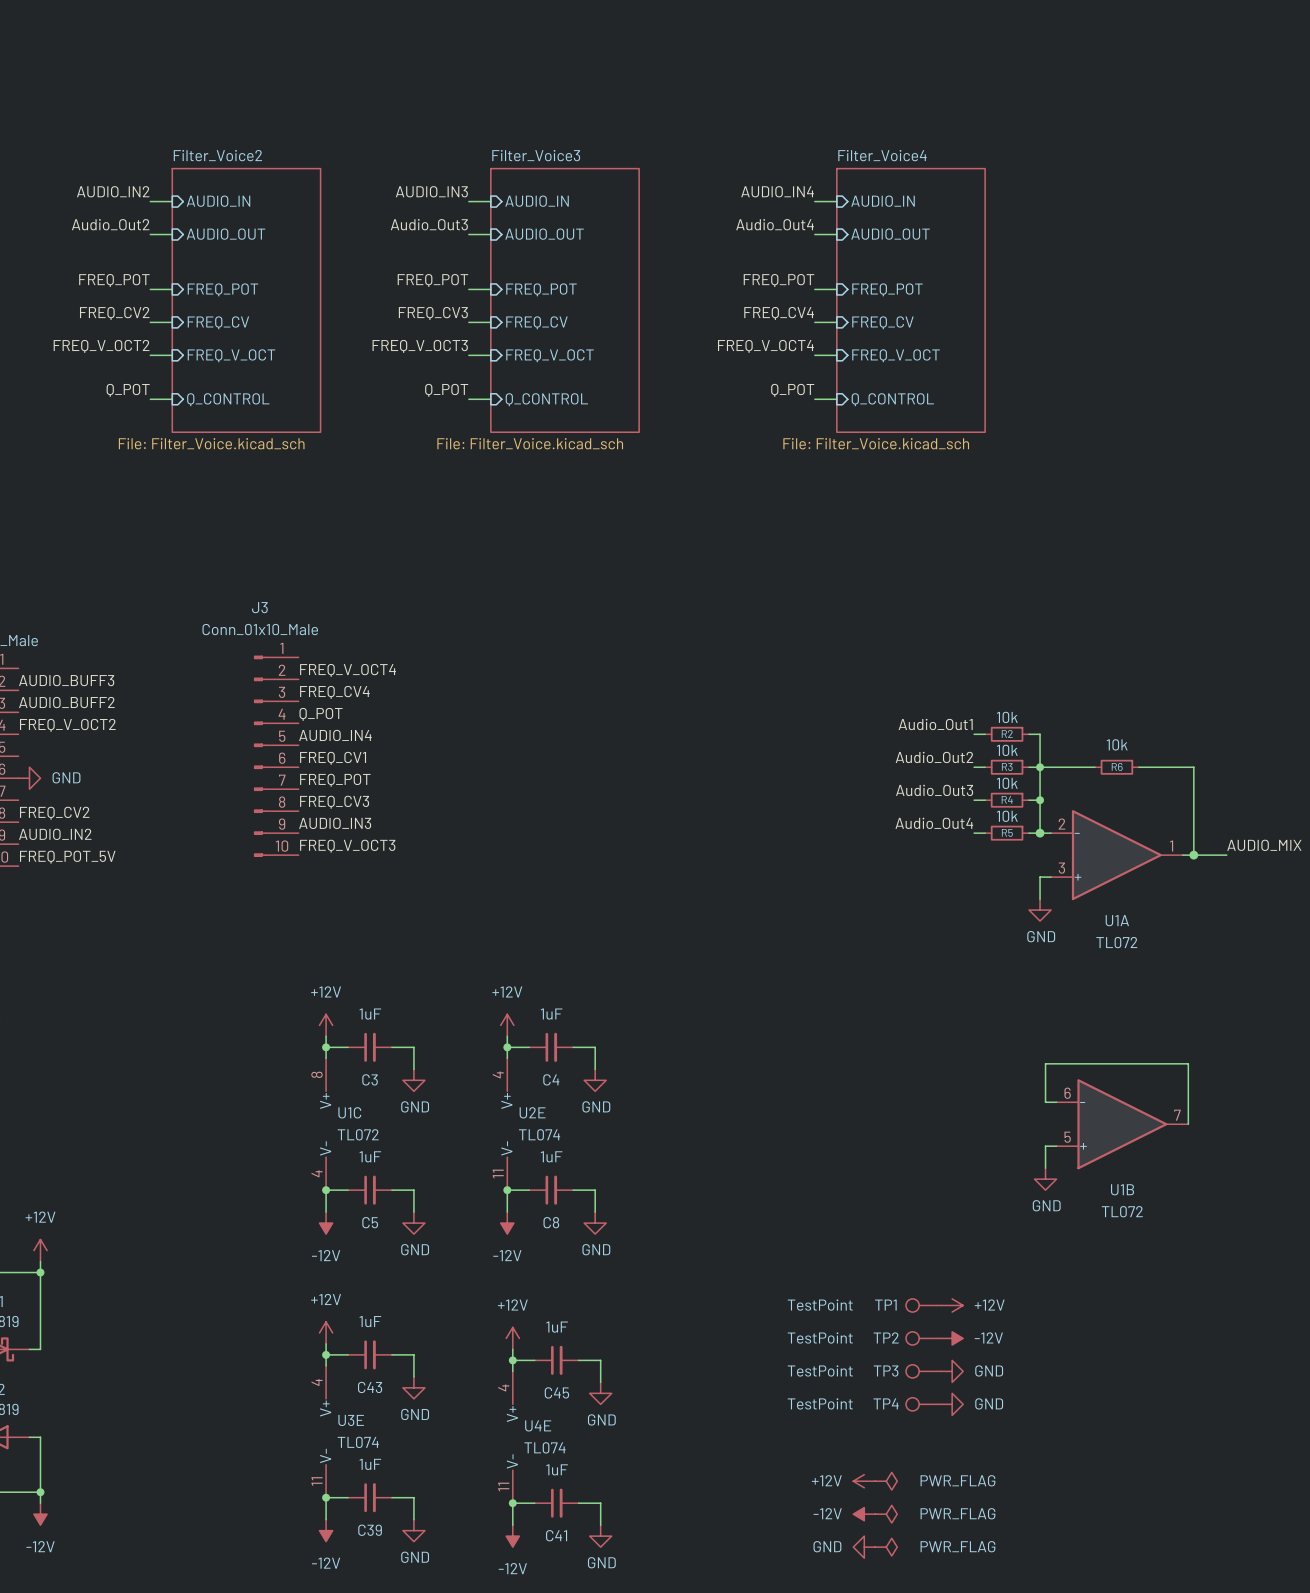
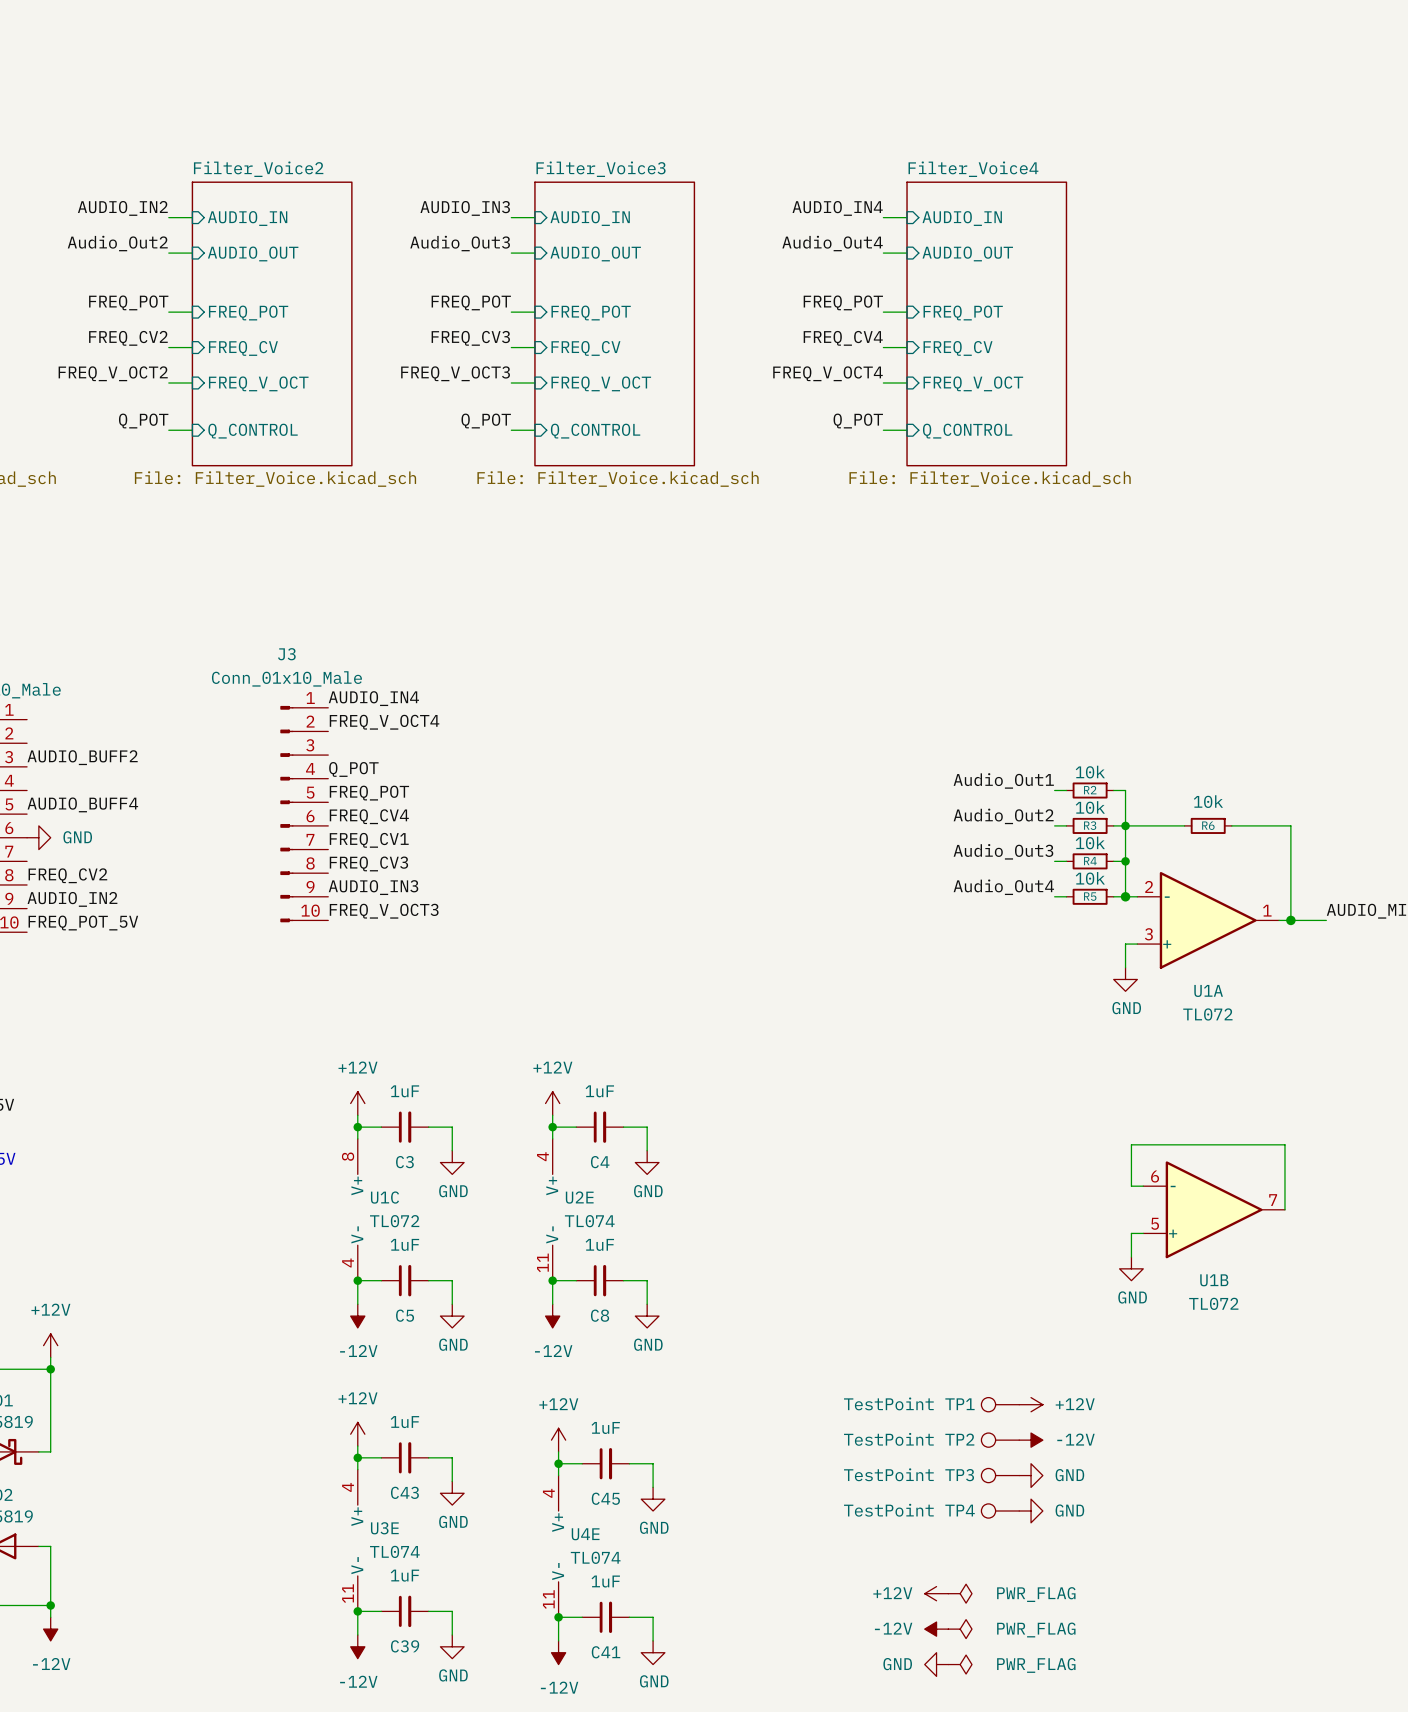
label: none -> AUDIO_IN4 (373, 698)
label: AUDIO_BUFF3 (66, 680) -> none
label: FREQ_CV4 (334, 692) -> none
label: FREQ_V_OCT2 (67, 725) -> none
label: AUDIO_IN4 (335, 735) -> FREQ_POT (369, 793)
label: none -> AUDIO_BUFF4 (82, 804)
label: FREQ_CV1 (333, 758) -> FREQ_CV4 (369, 816)
label: FREQ_POT (335, 780) -> FREQ_CV1 (369, 840)

